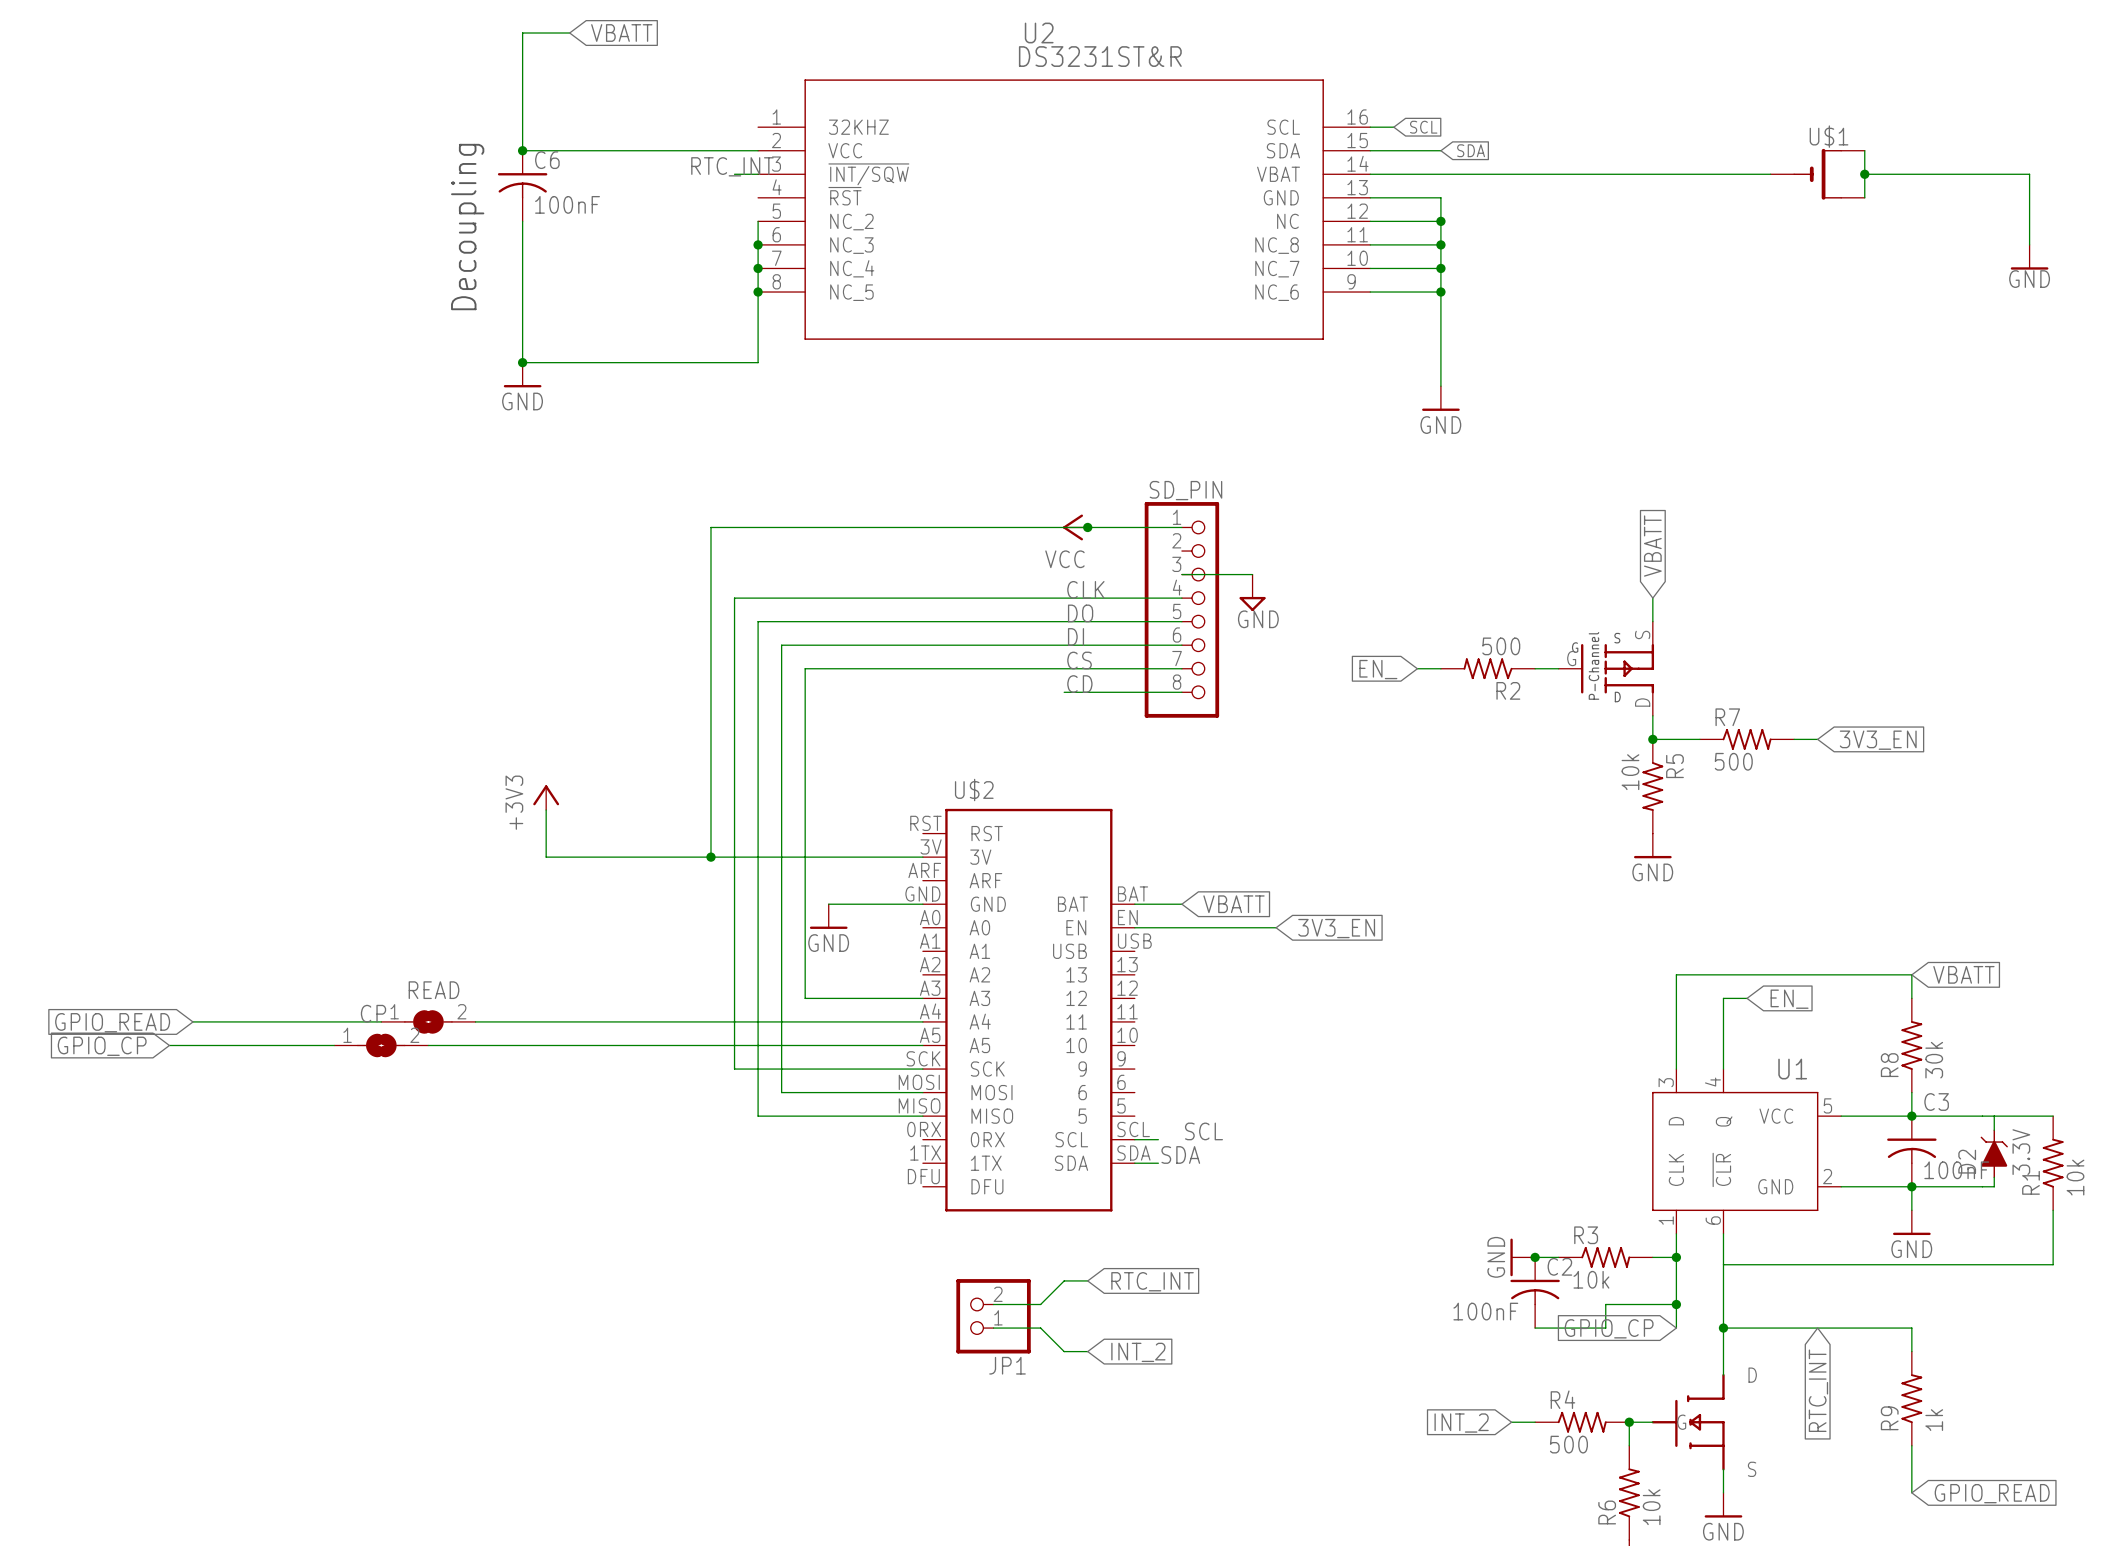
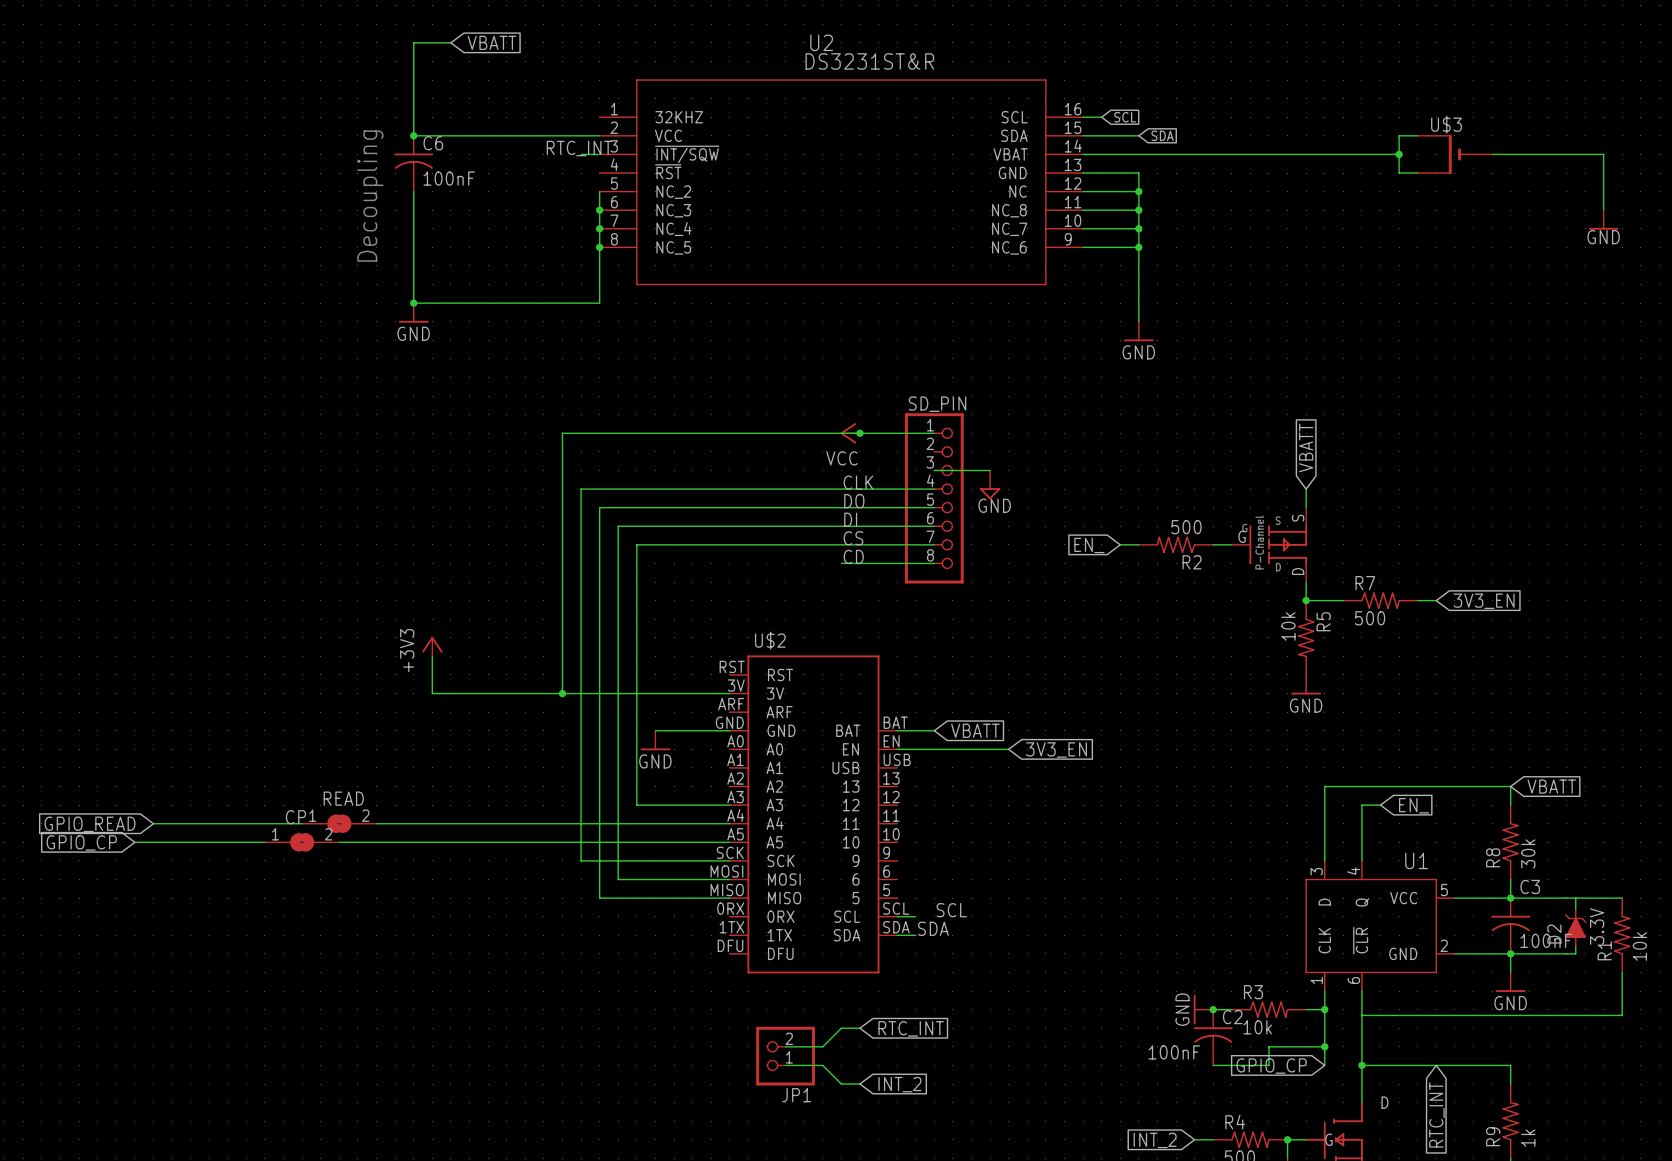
wire: none -> (1417, 135) (1399, 135) (1399, 173) (1417, 173)
wire: (1864, 150) (1864, 197) -> none
junction: none -> (1399, 154)
U$1: (1817, 174) -> none
U$3: none -> (1454, 154)
junction: (1864, 174) -> none

